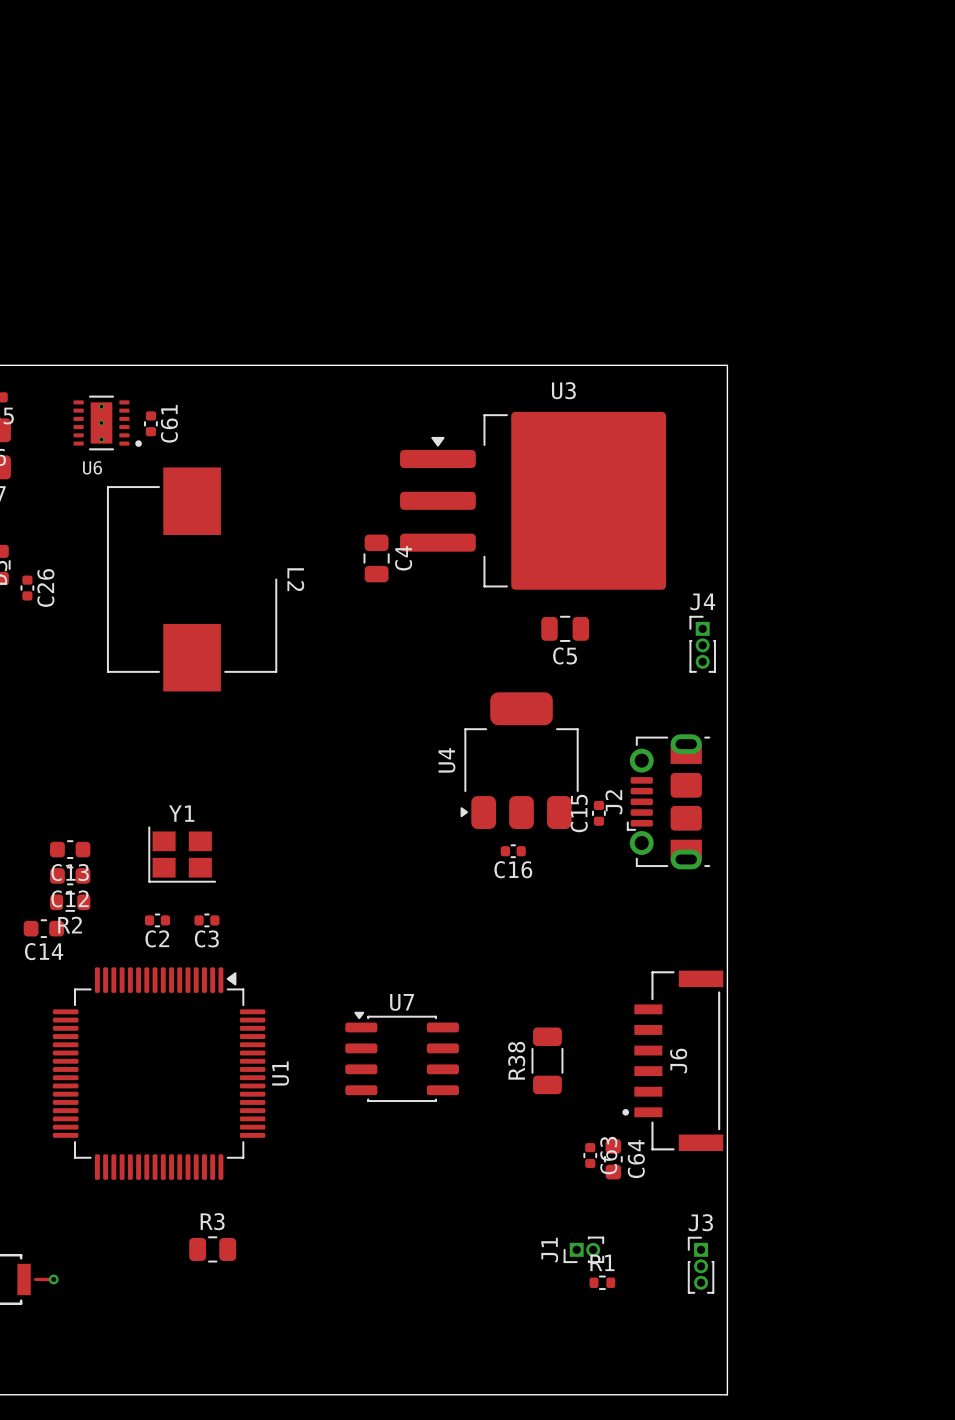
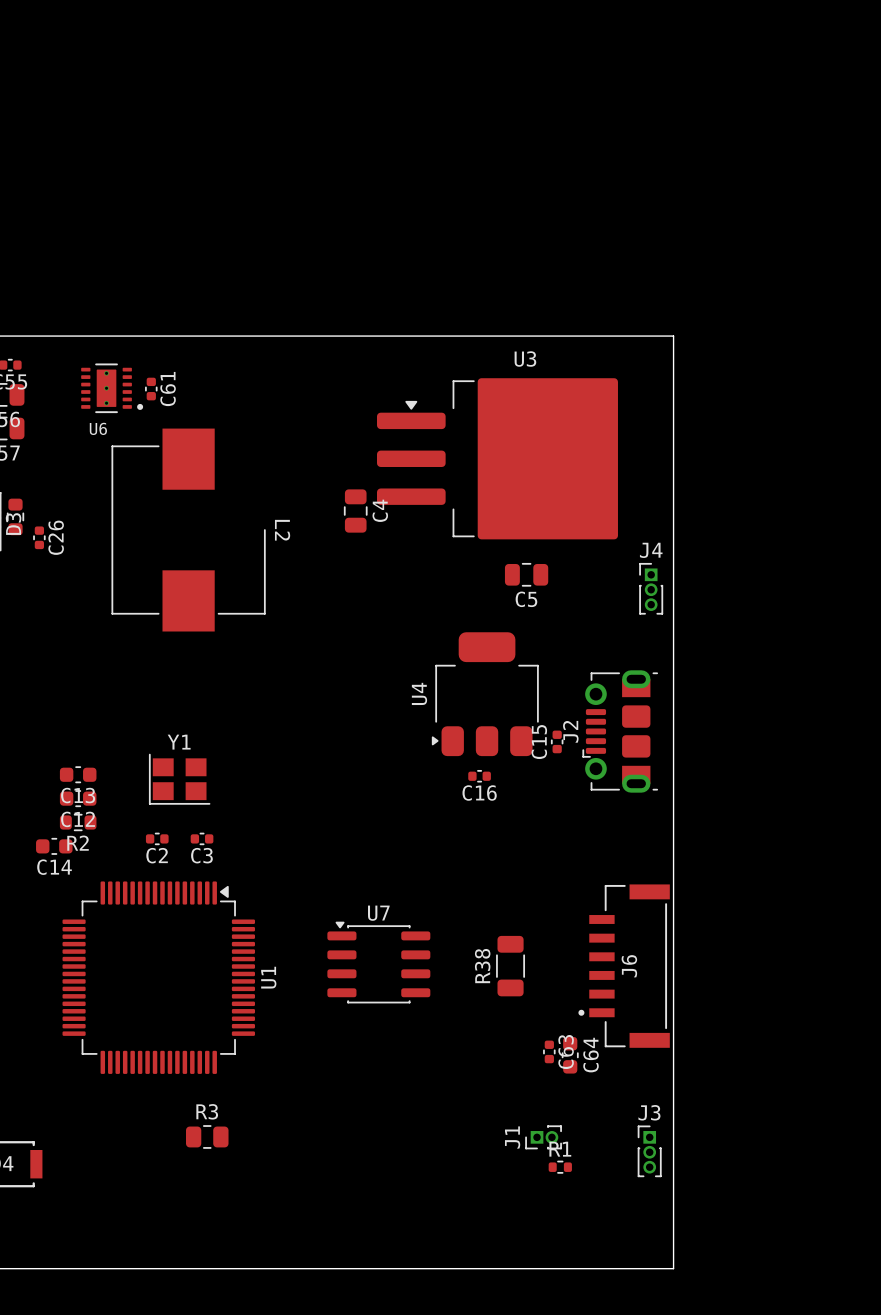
track: (35, 1279) (53, 1279) -> none
via: (53, 1279) -> none

